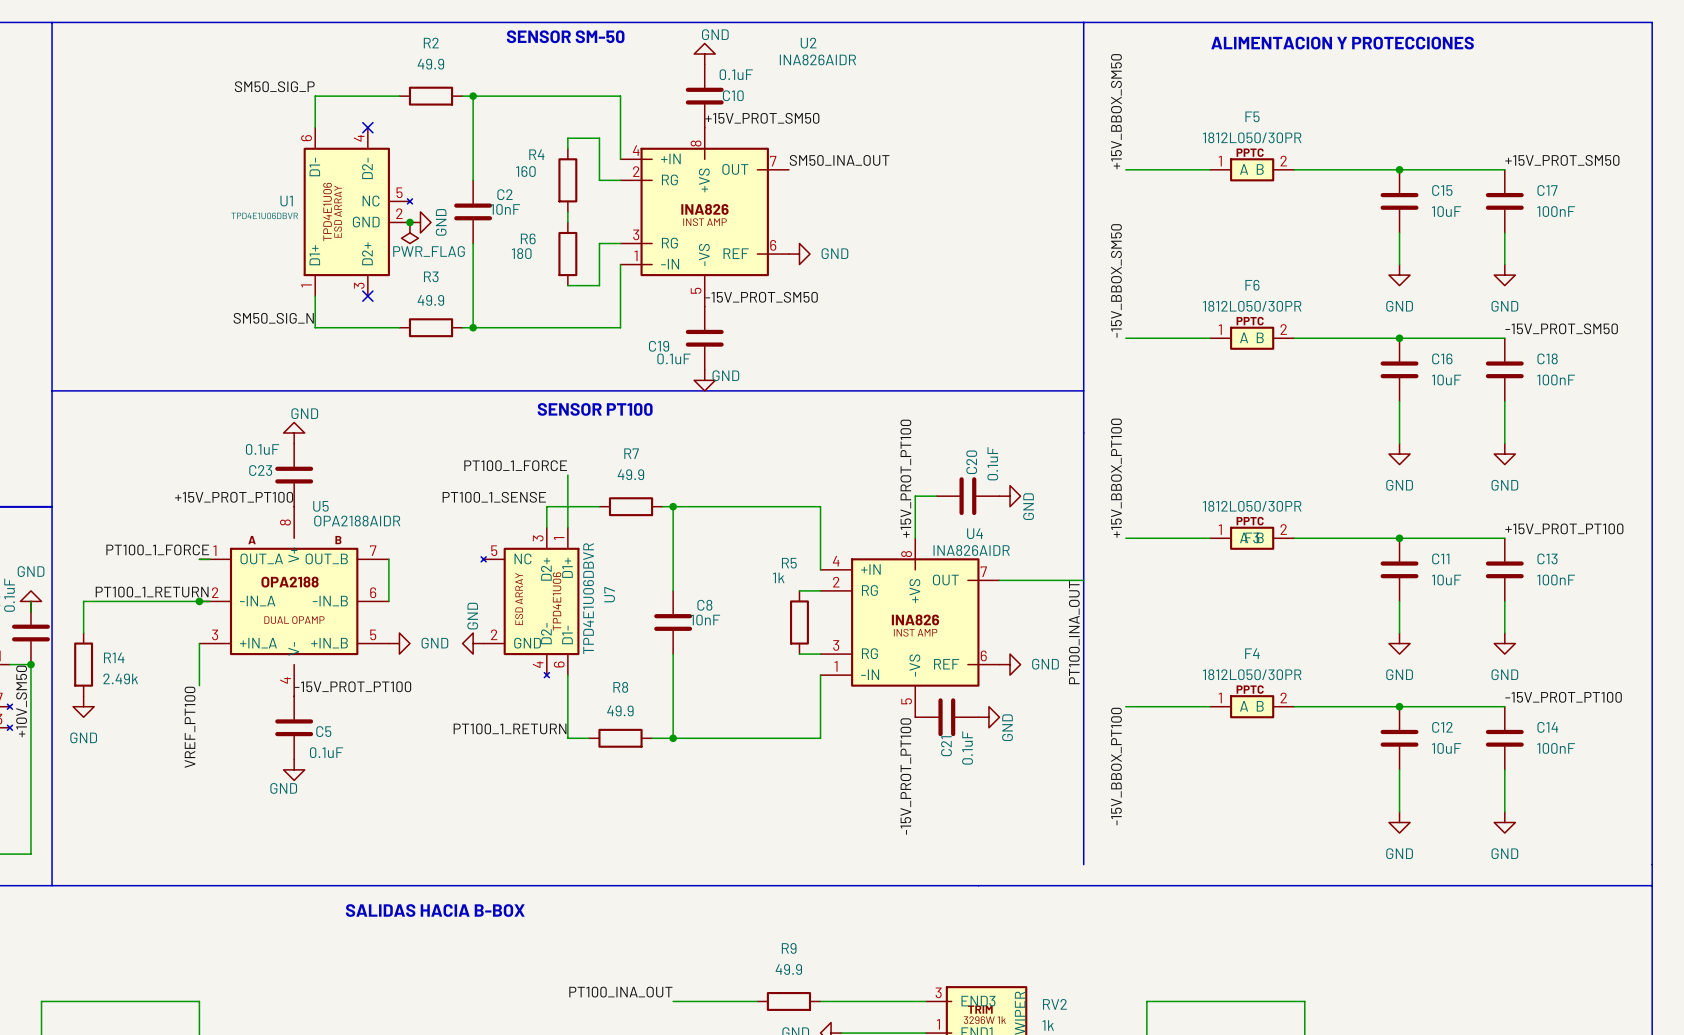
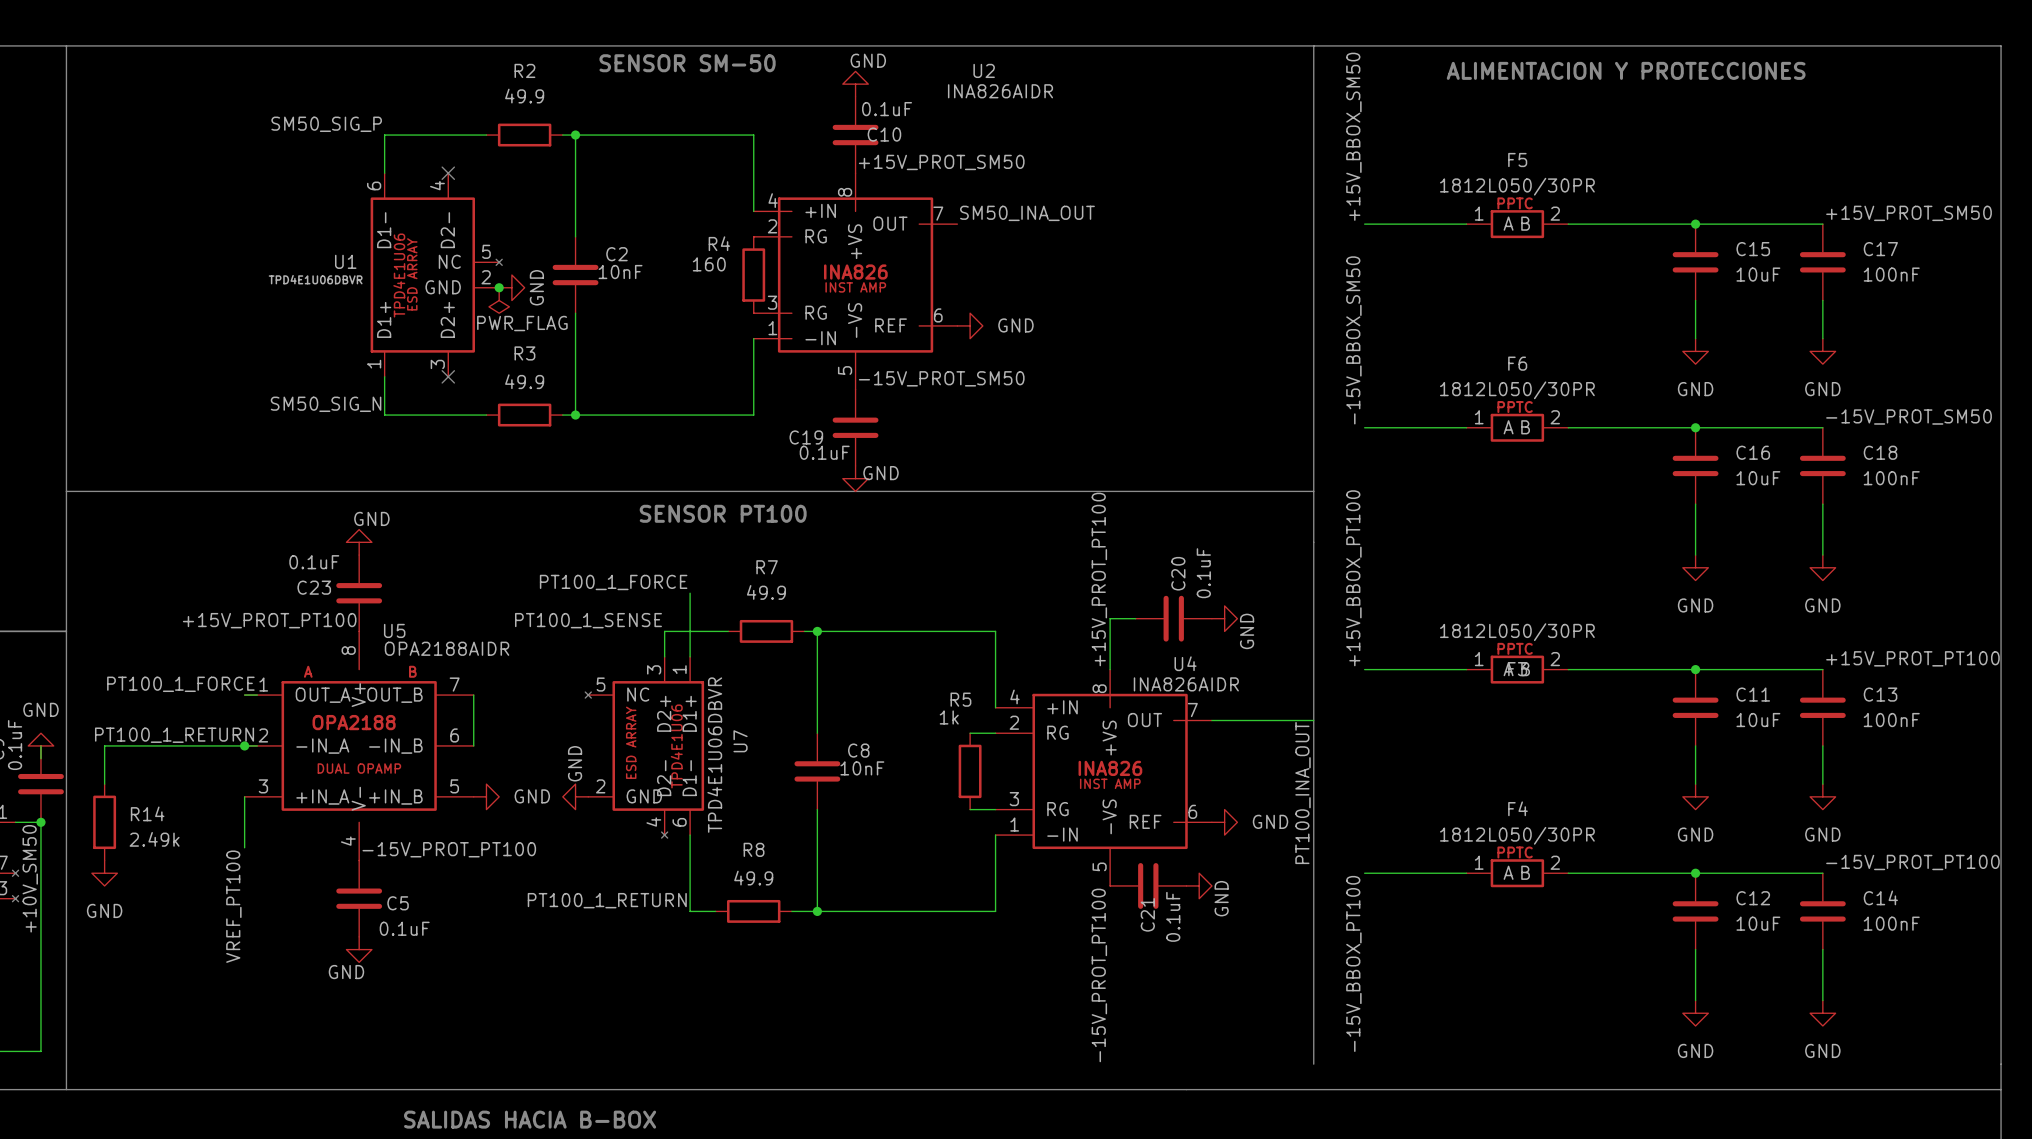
wire: (567, 148) (567, 138) (599, 138) (599, 180) (620, 180) -> none
R4 position: (567, 180) -> (753, 275)
wire: (567, 211) (567, 222) -> none
wire: (620, 243) (599, 243) (599, 285) (567, 285) -> none
R6: 180 (567, 254) -> none

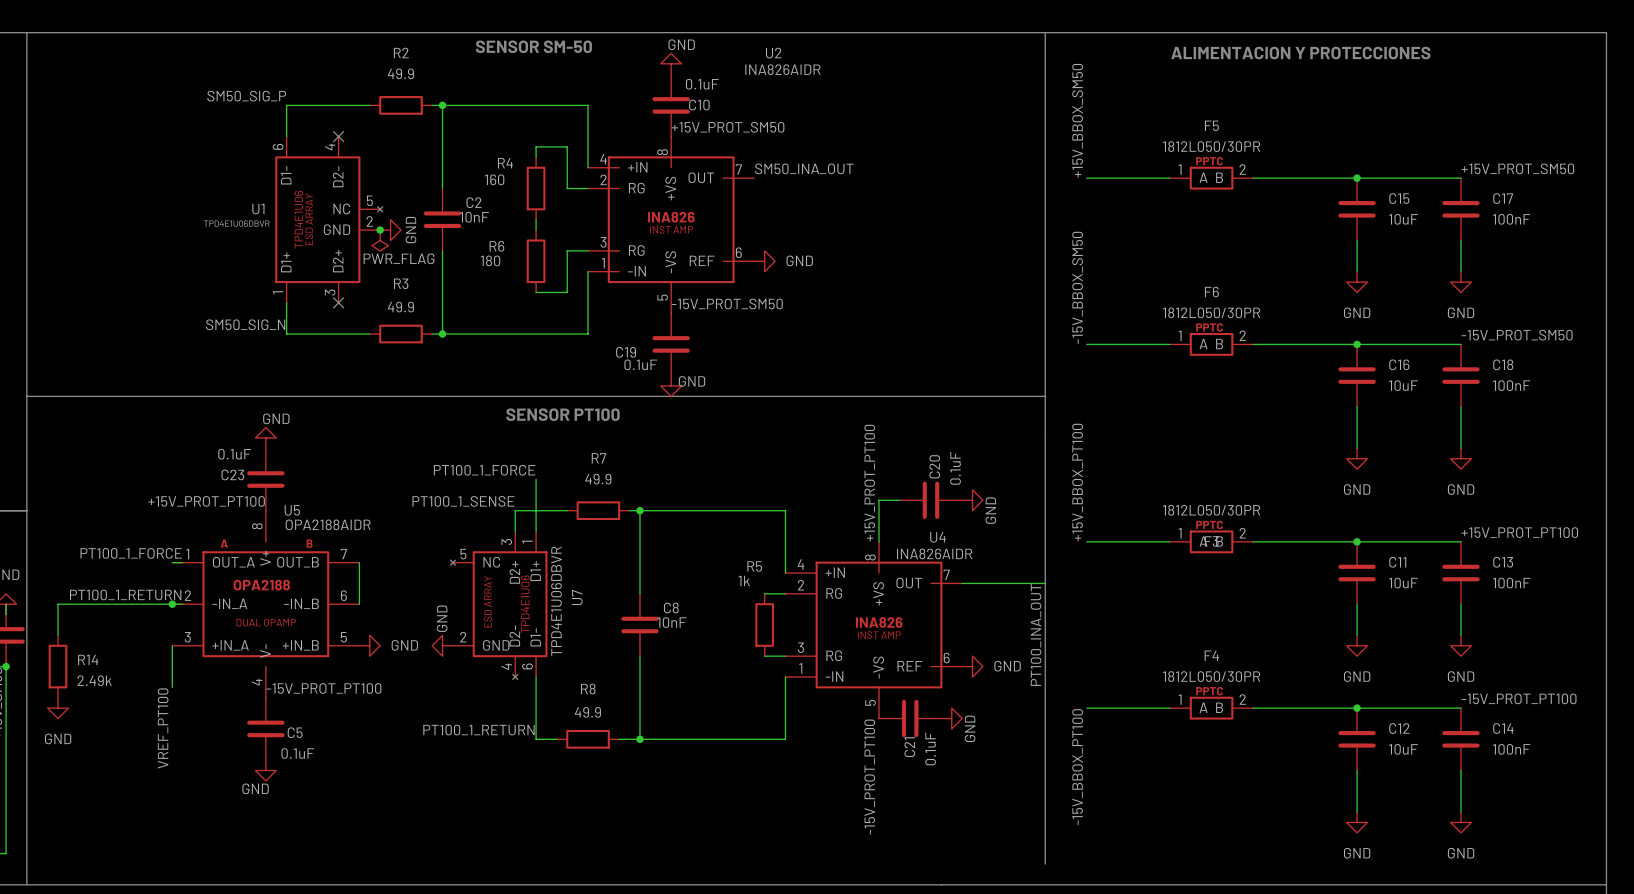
wire: none -> (536, 157) (536, 146) (567, 146) (567, 188) (588, 188)
wire: none -> (536, 219) (536, 230)
R4 position: (753, 275) -> (536, 188)
wire: none -> (588, 250) (567, 250) (567, 292) (536, 292)
R6: none -> 180 (536, 261)

